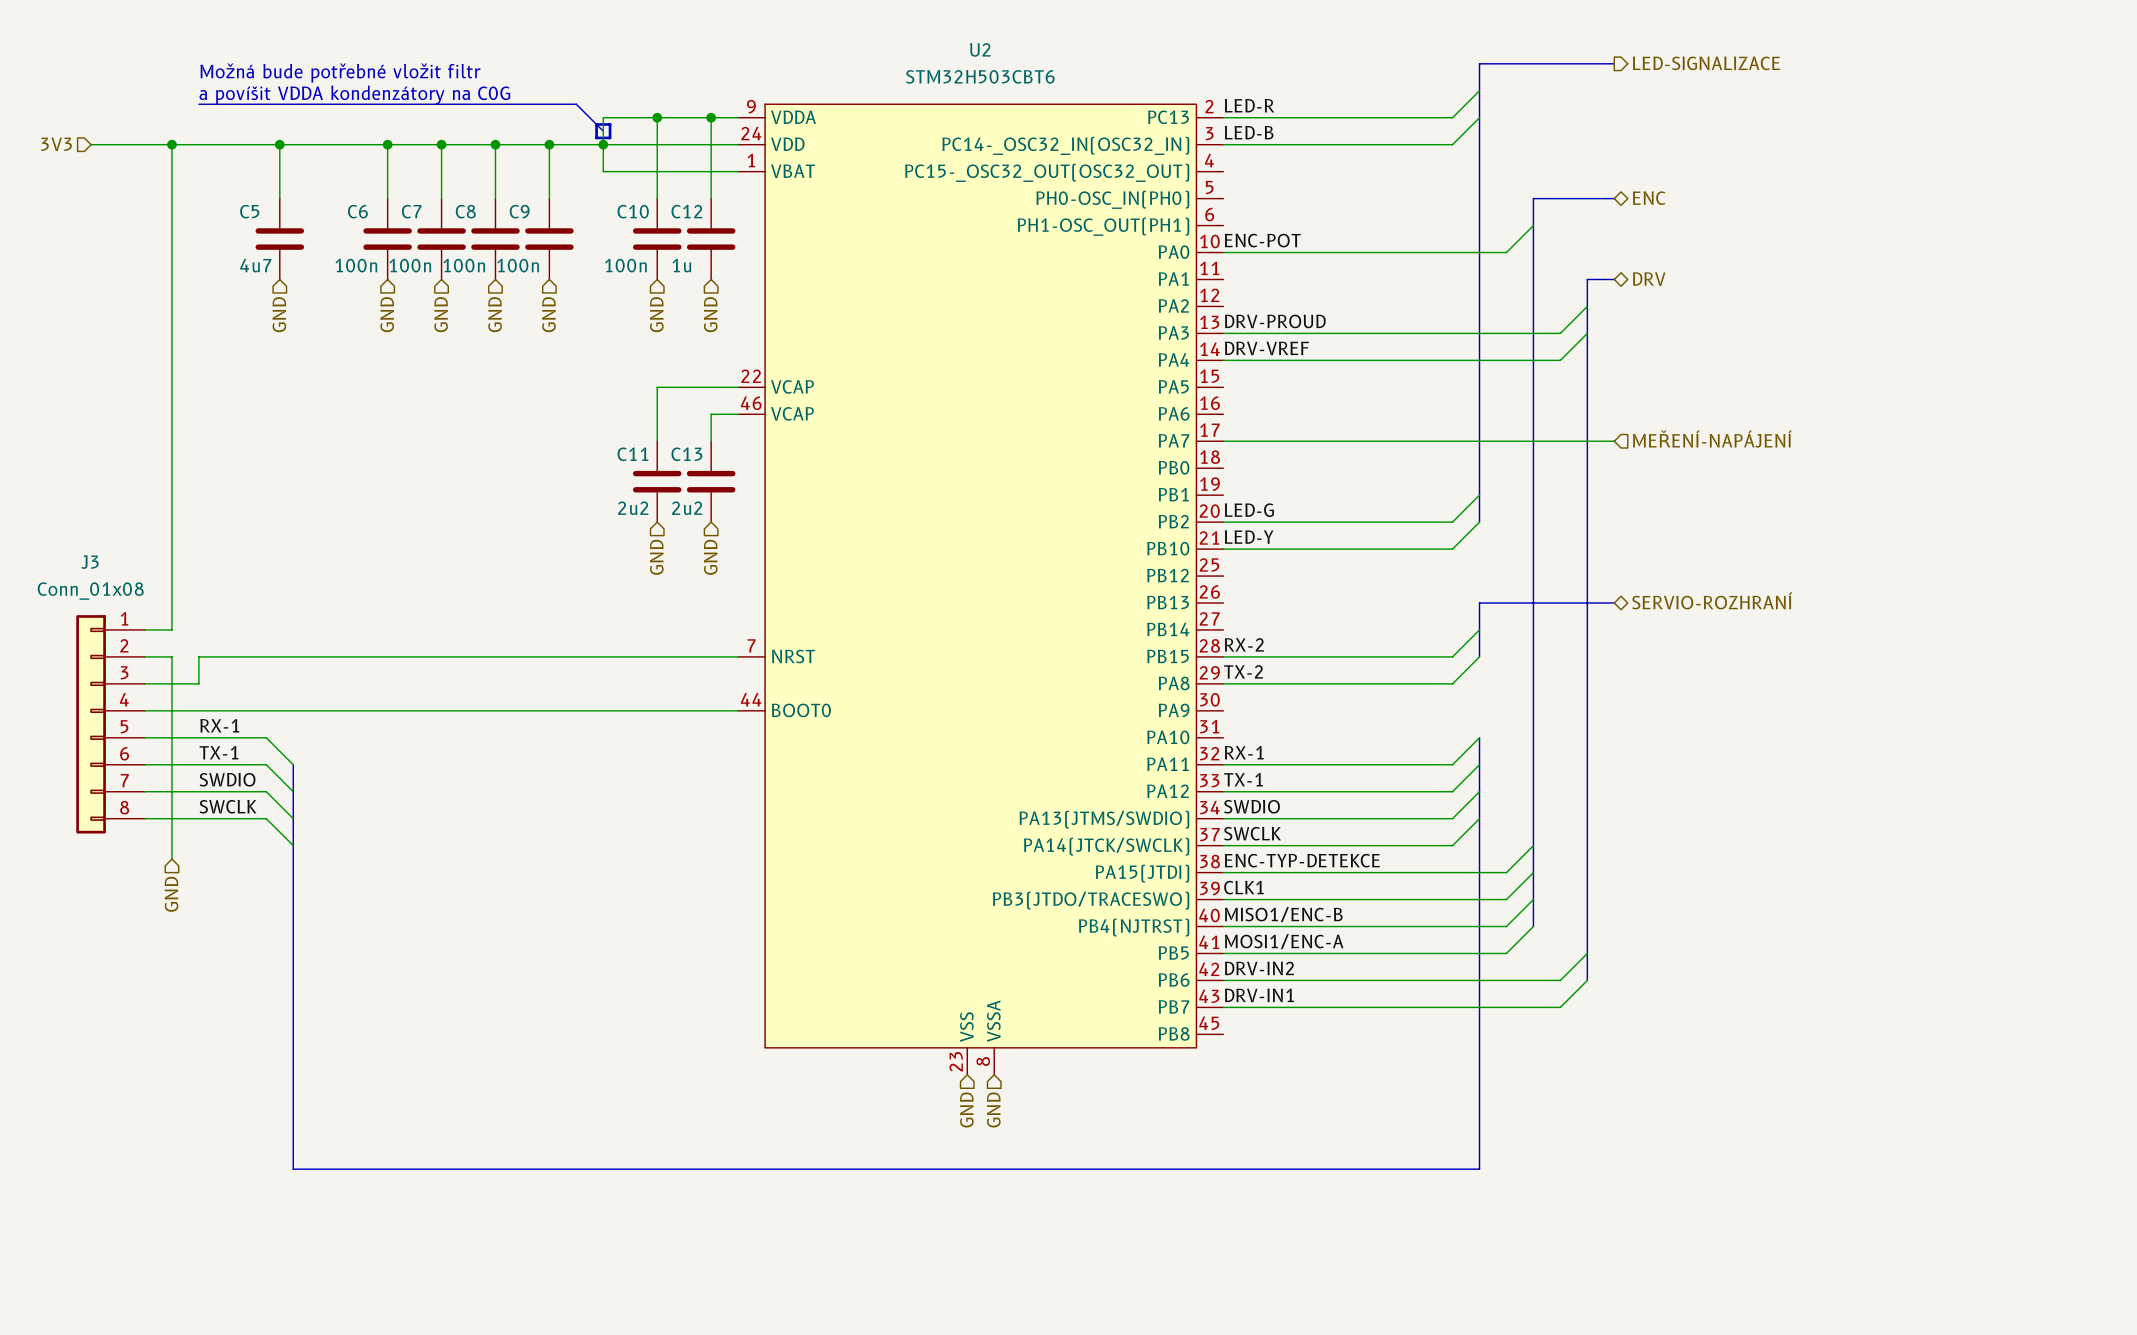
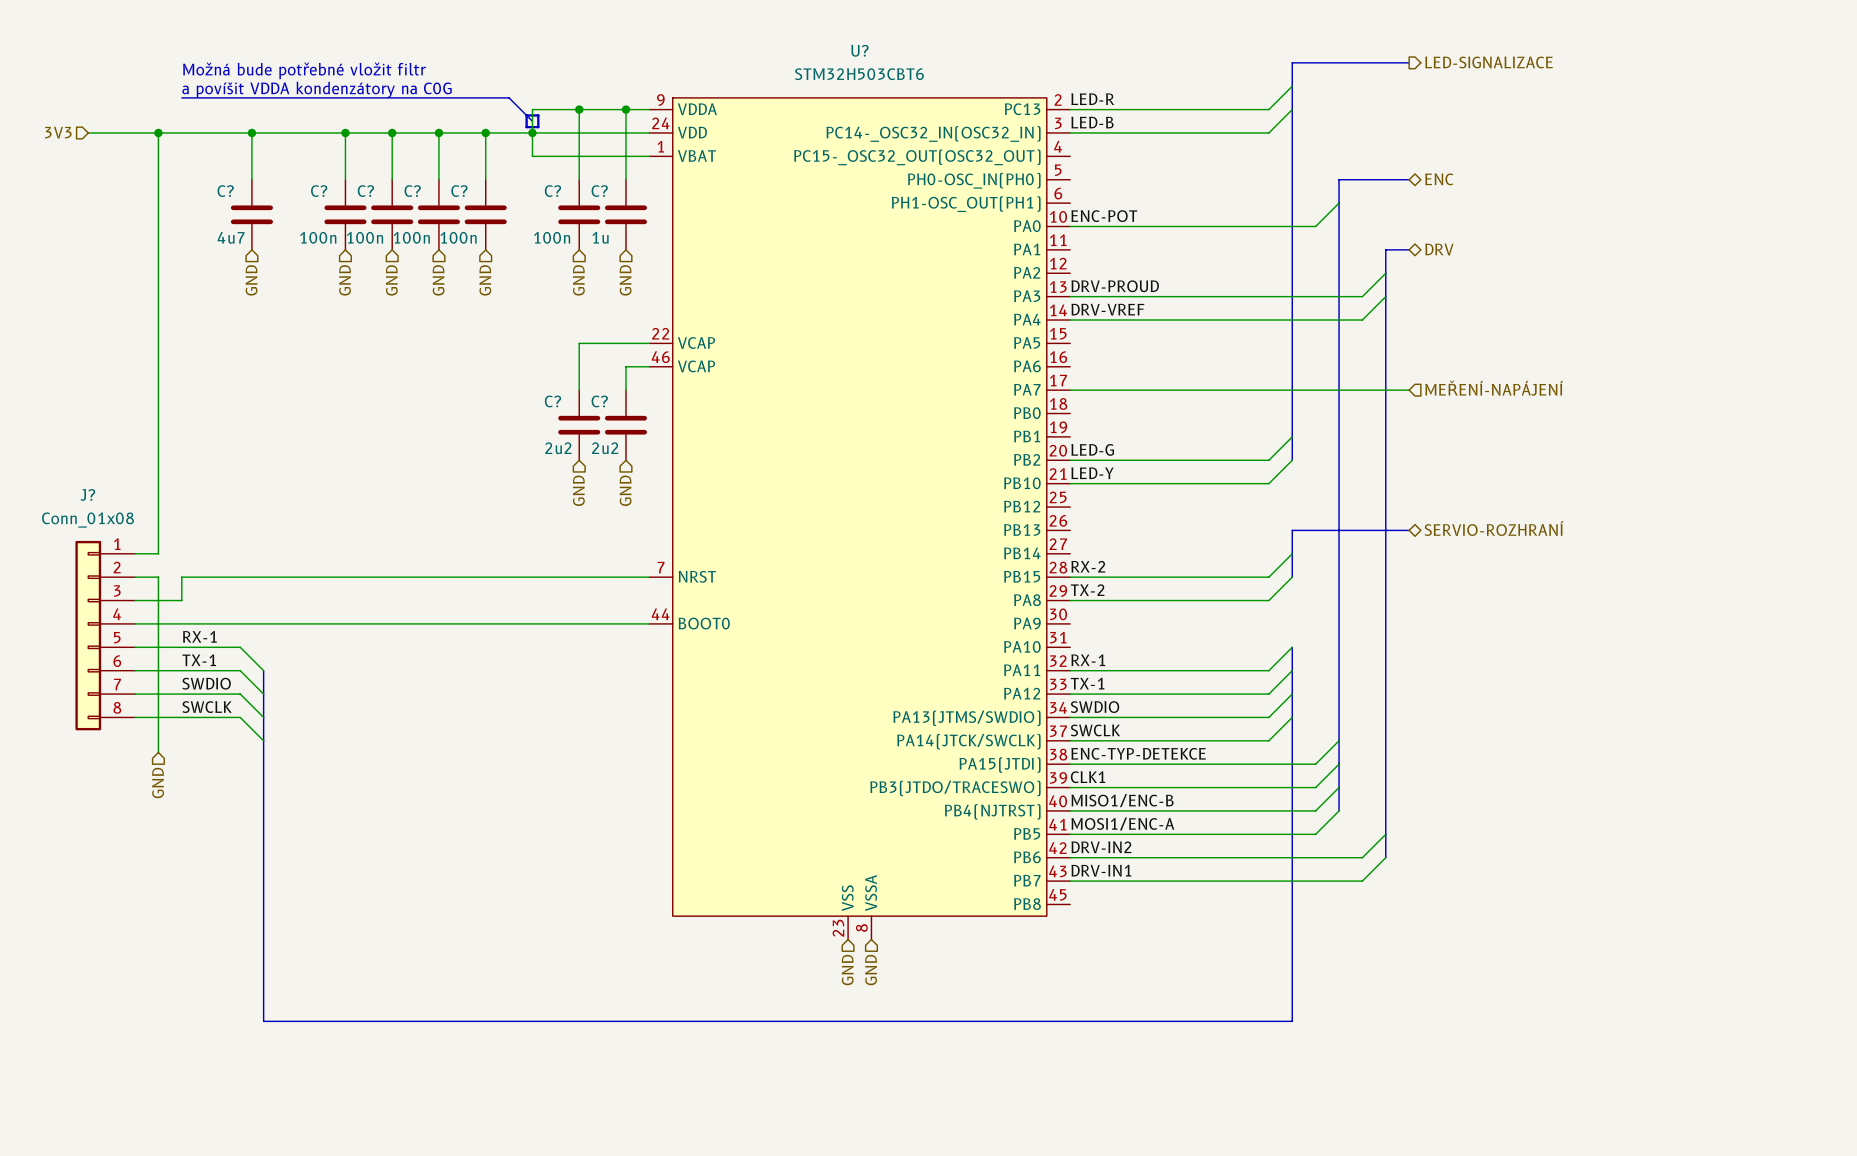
U2 name: U2 (980, 49) -> U? (859, 50)
C5 name: C5 (249, 211) -> C? (225, 191)
C6 name: C6 (357, 211) -> C? (319, 191)
C7 name: C7 (411, 211) -> C? (365, 191)
C8 name: C8 (465, 211) -> C? (412, 191)
C9 name: C9 (519, 211) -> C? (459, 191)
C10 name: C10 (633, 211) -> C? (552, 191)
C12 name: C12 (686, 211) -> C? (599, 191)
C11 name: C11 (632, 454) -> C? (552, 401)
C13 name: C13 (686, 454) -> C? (599, 401)
J3 name: J3 (90, 562) -> J? (87, 494)

